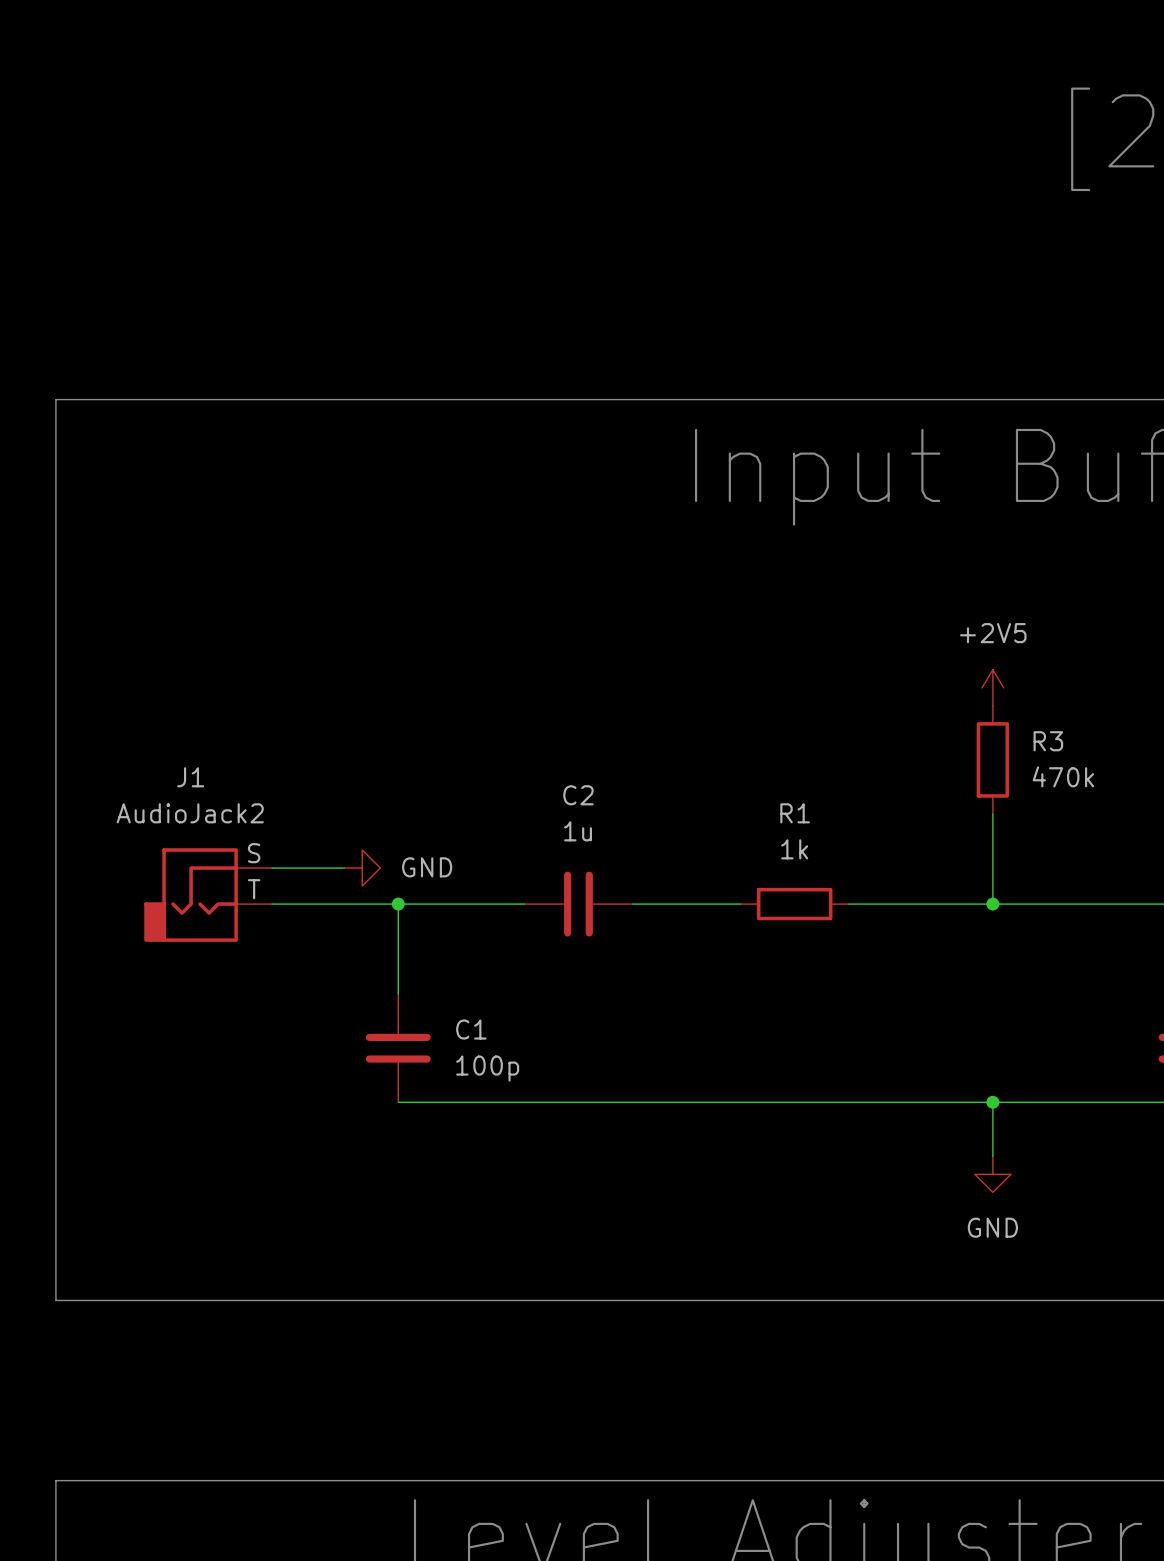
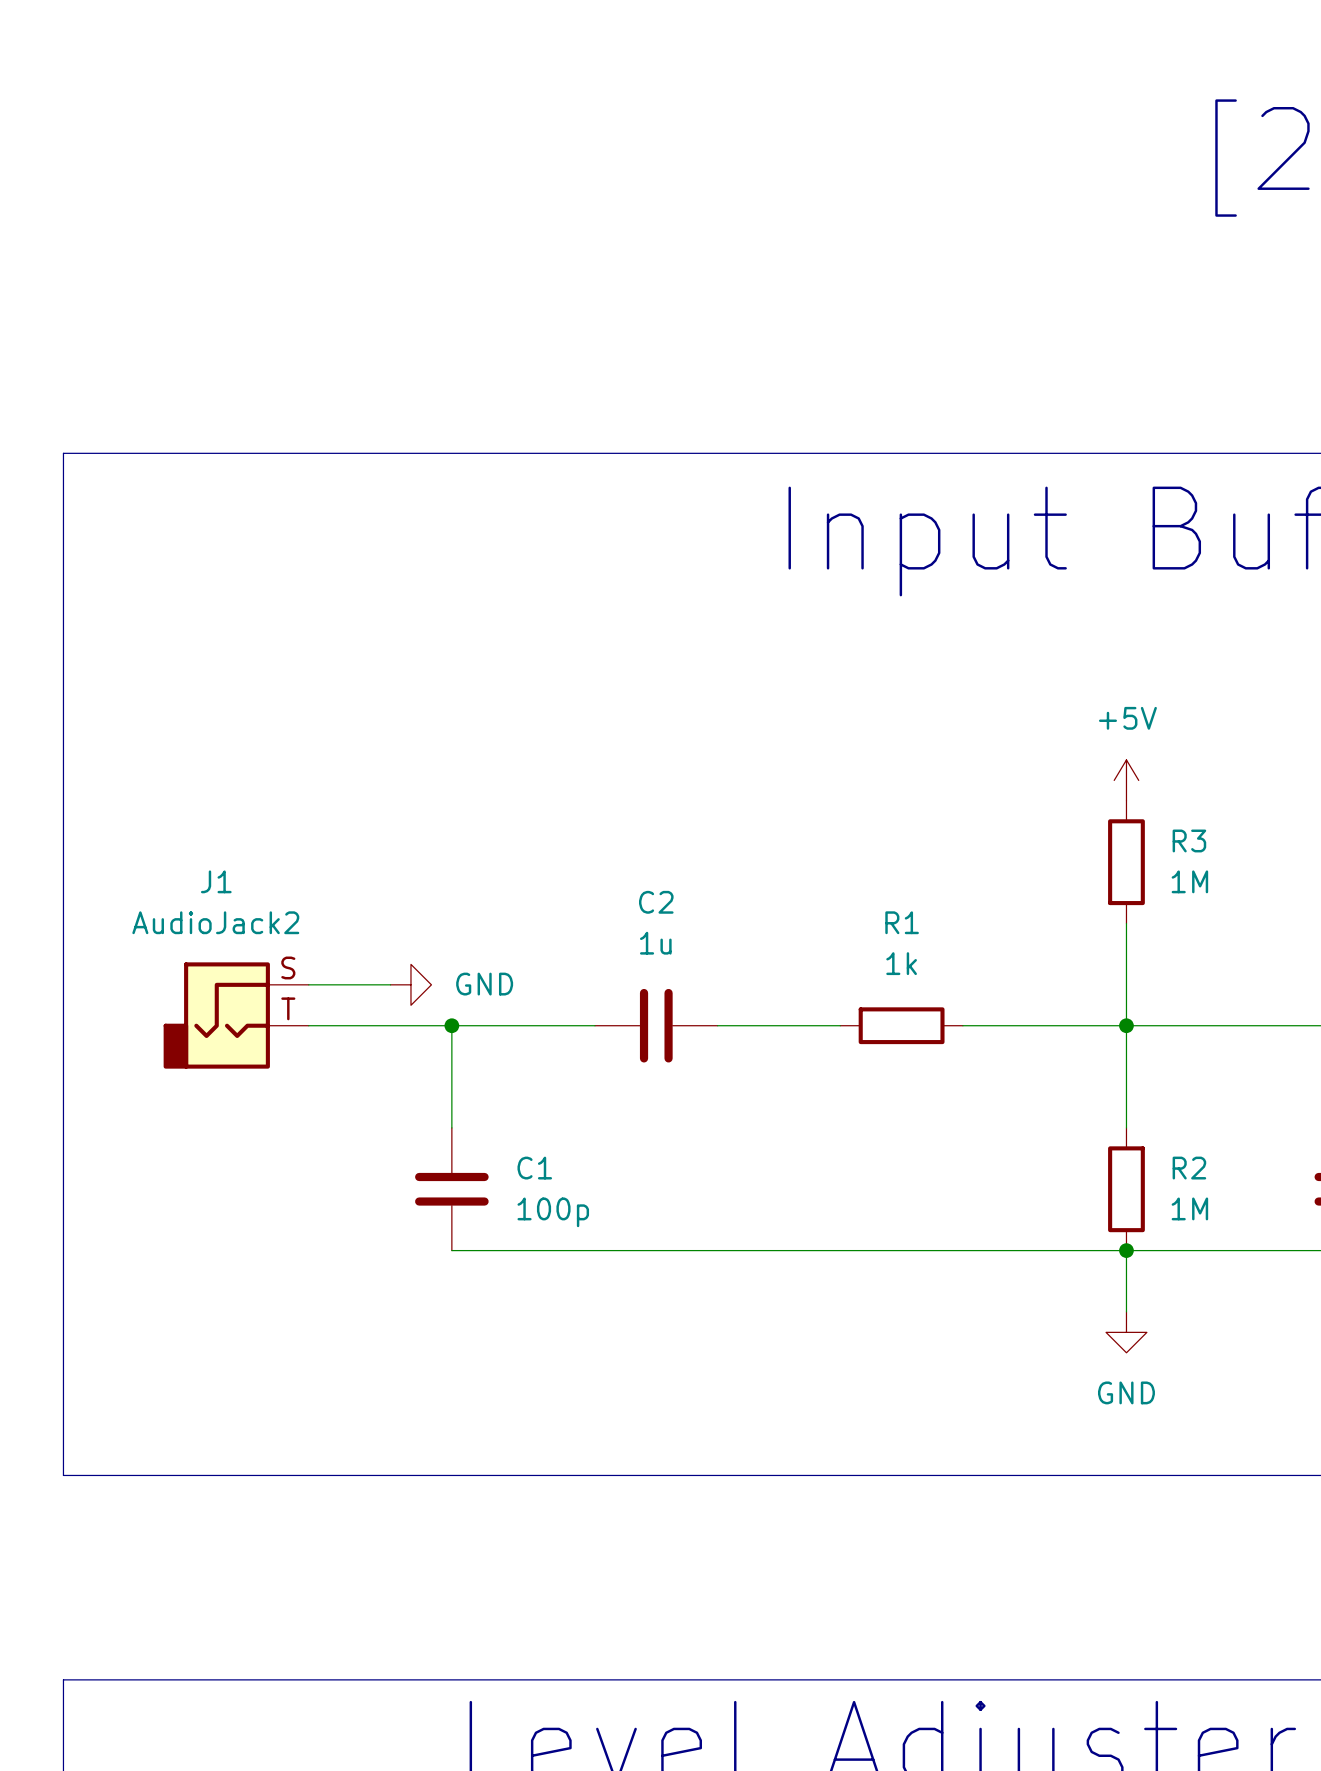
power symbol: +2V5 (992, 687) -> +5V (1126, 780)
R3 value: 470k (1063, 776) -> 1M (1189, 881)
wire: none -> (1126, 1025) (1126, 1127)
R2: none -> 1M (1126, 1189)

